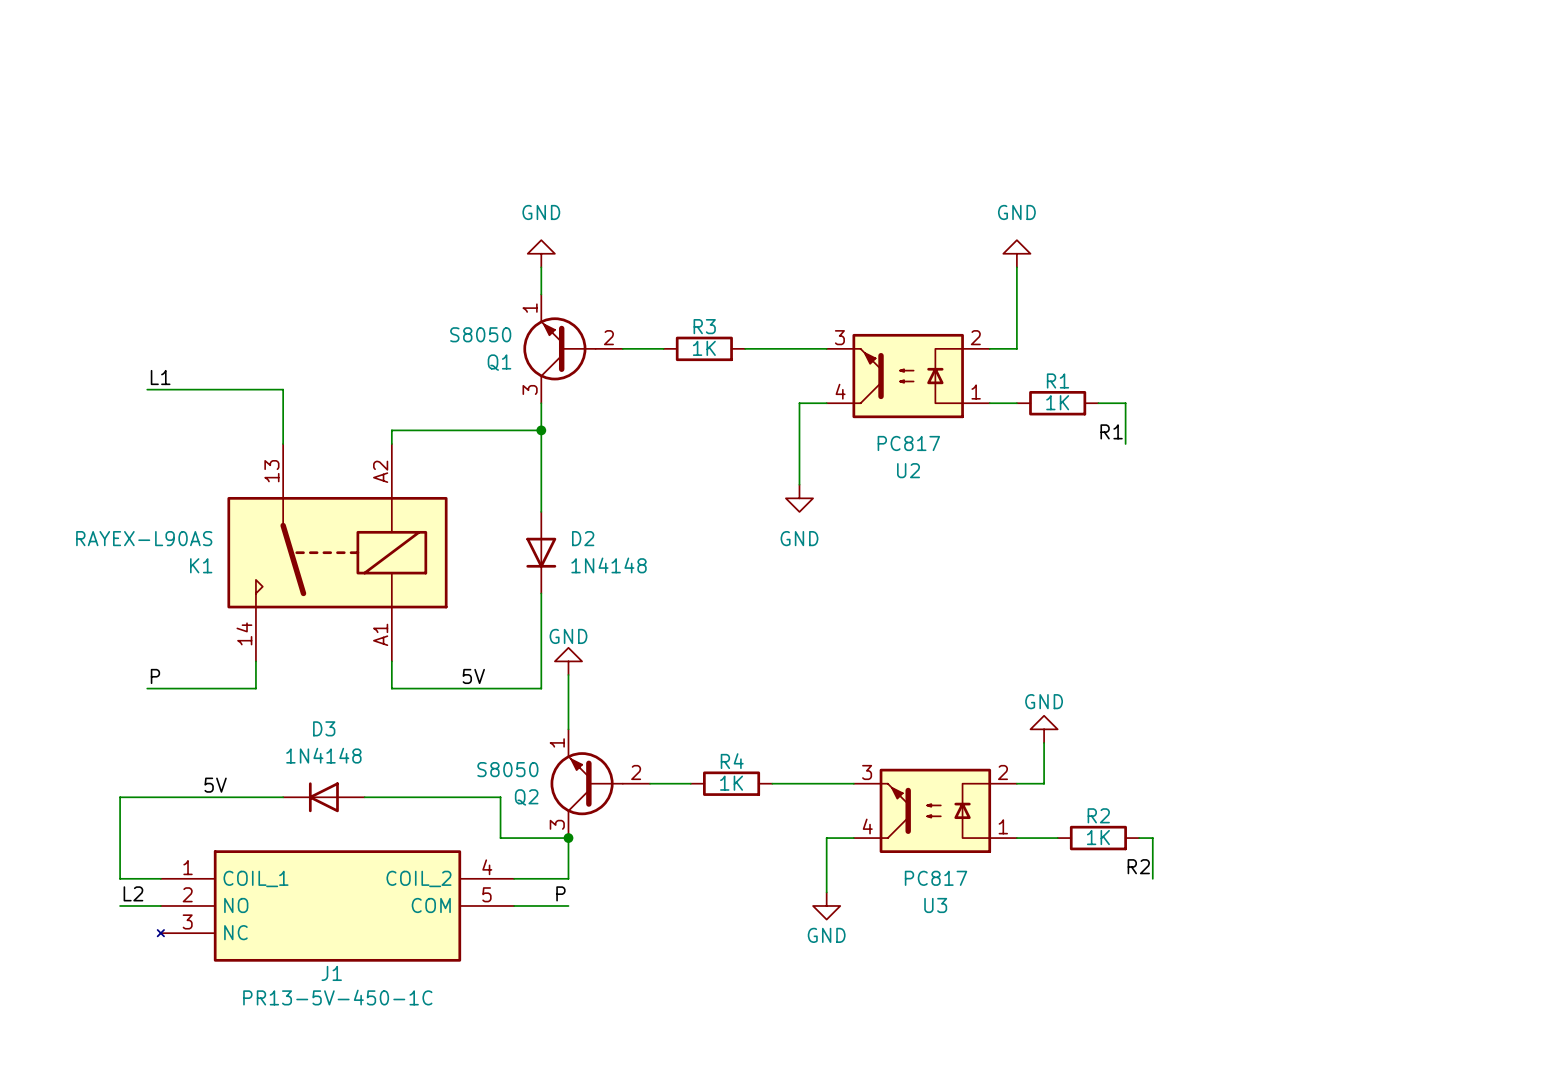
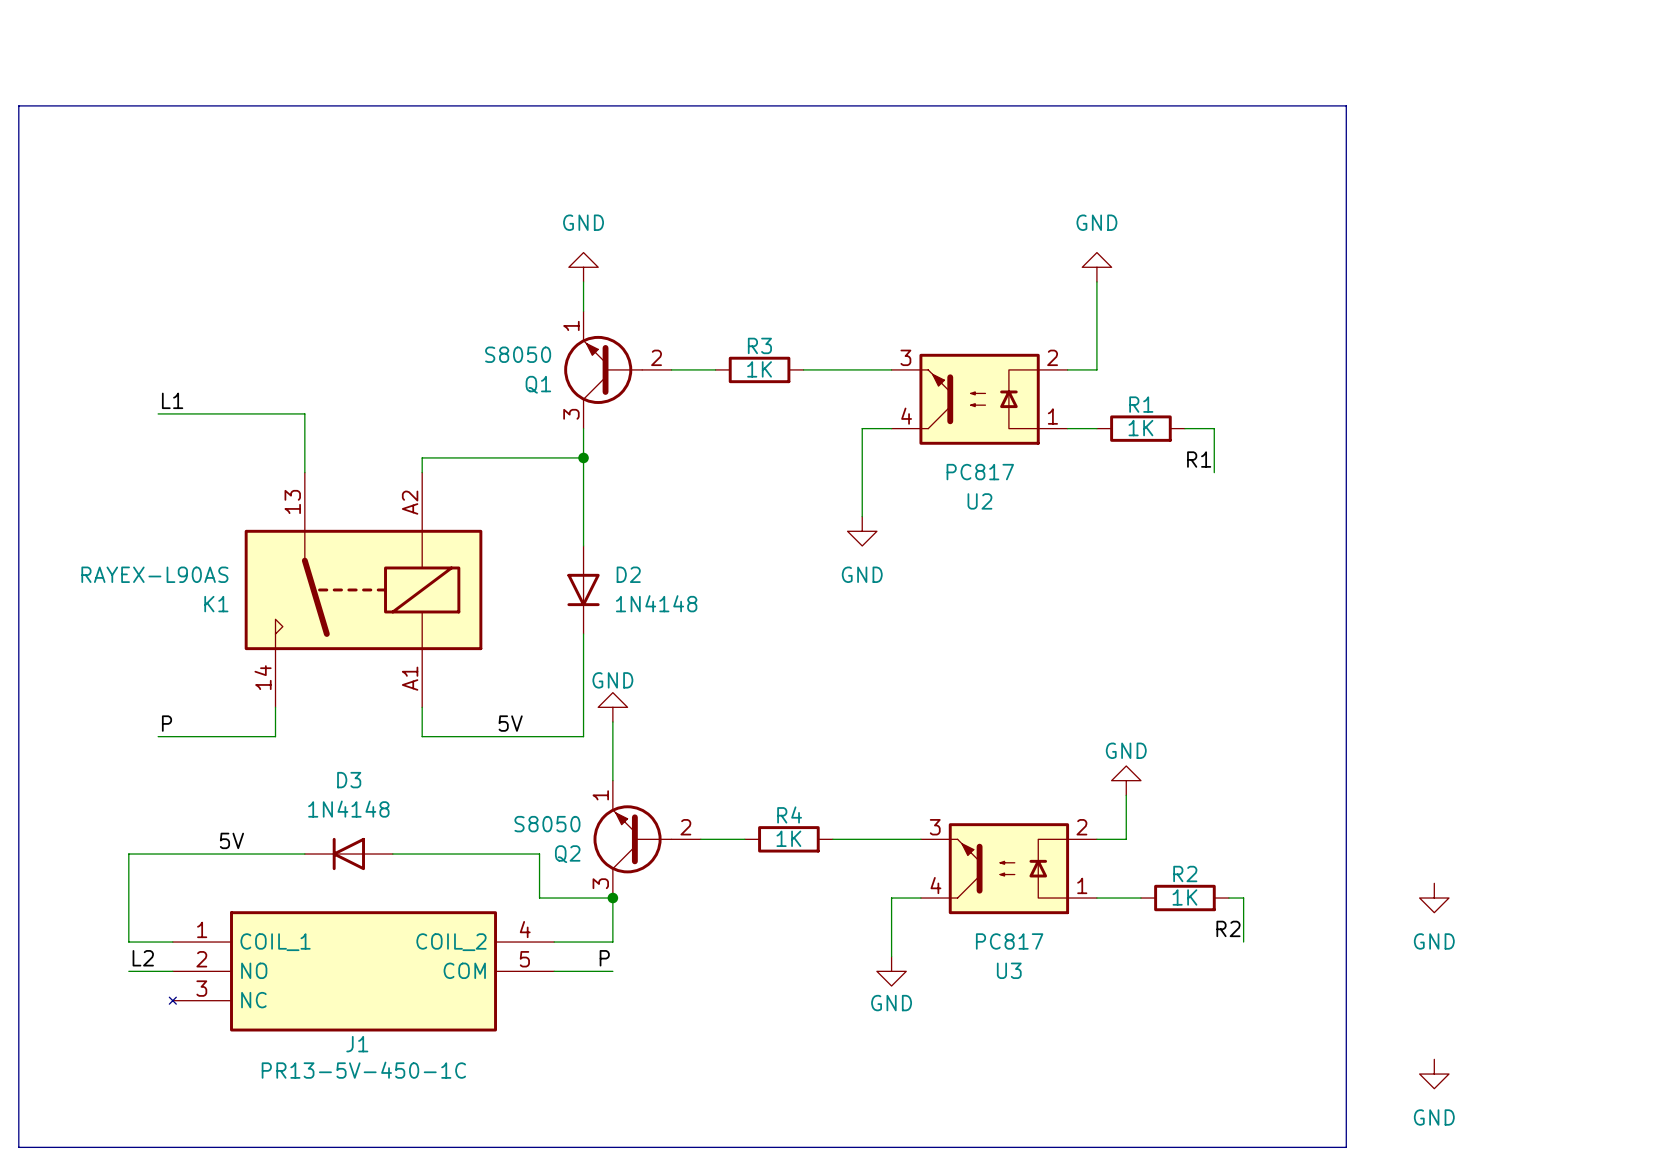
line: none -> (18, 105) (1346, 105) (1346, 1147) (18, 1147) (18, 105)
power symbol: none -> GND (1434, 898)
power symbol: none -> GND (1434, 1074)

